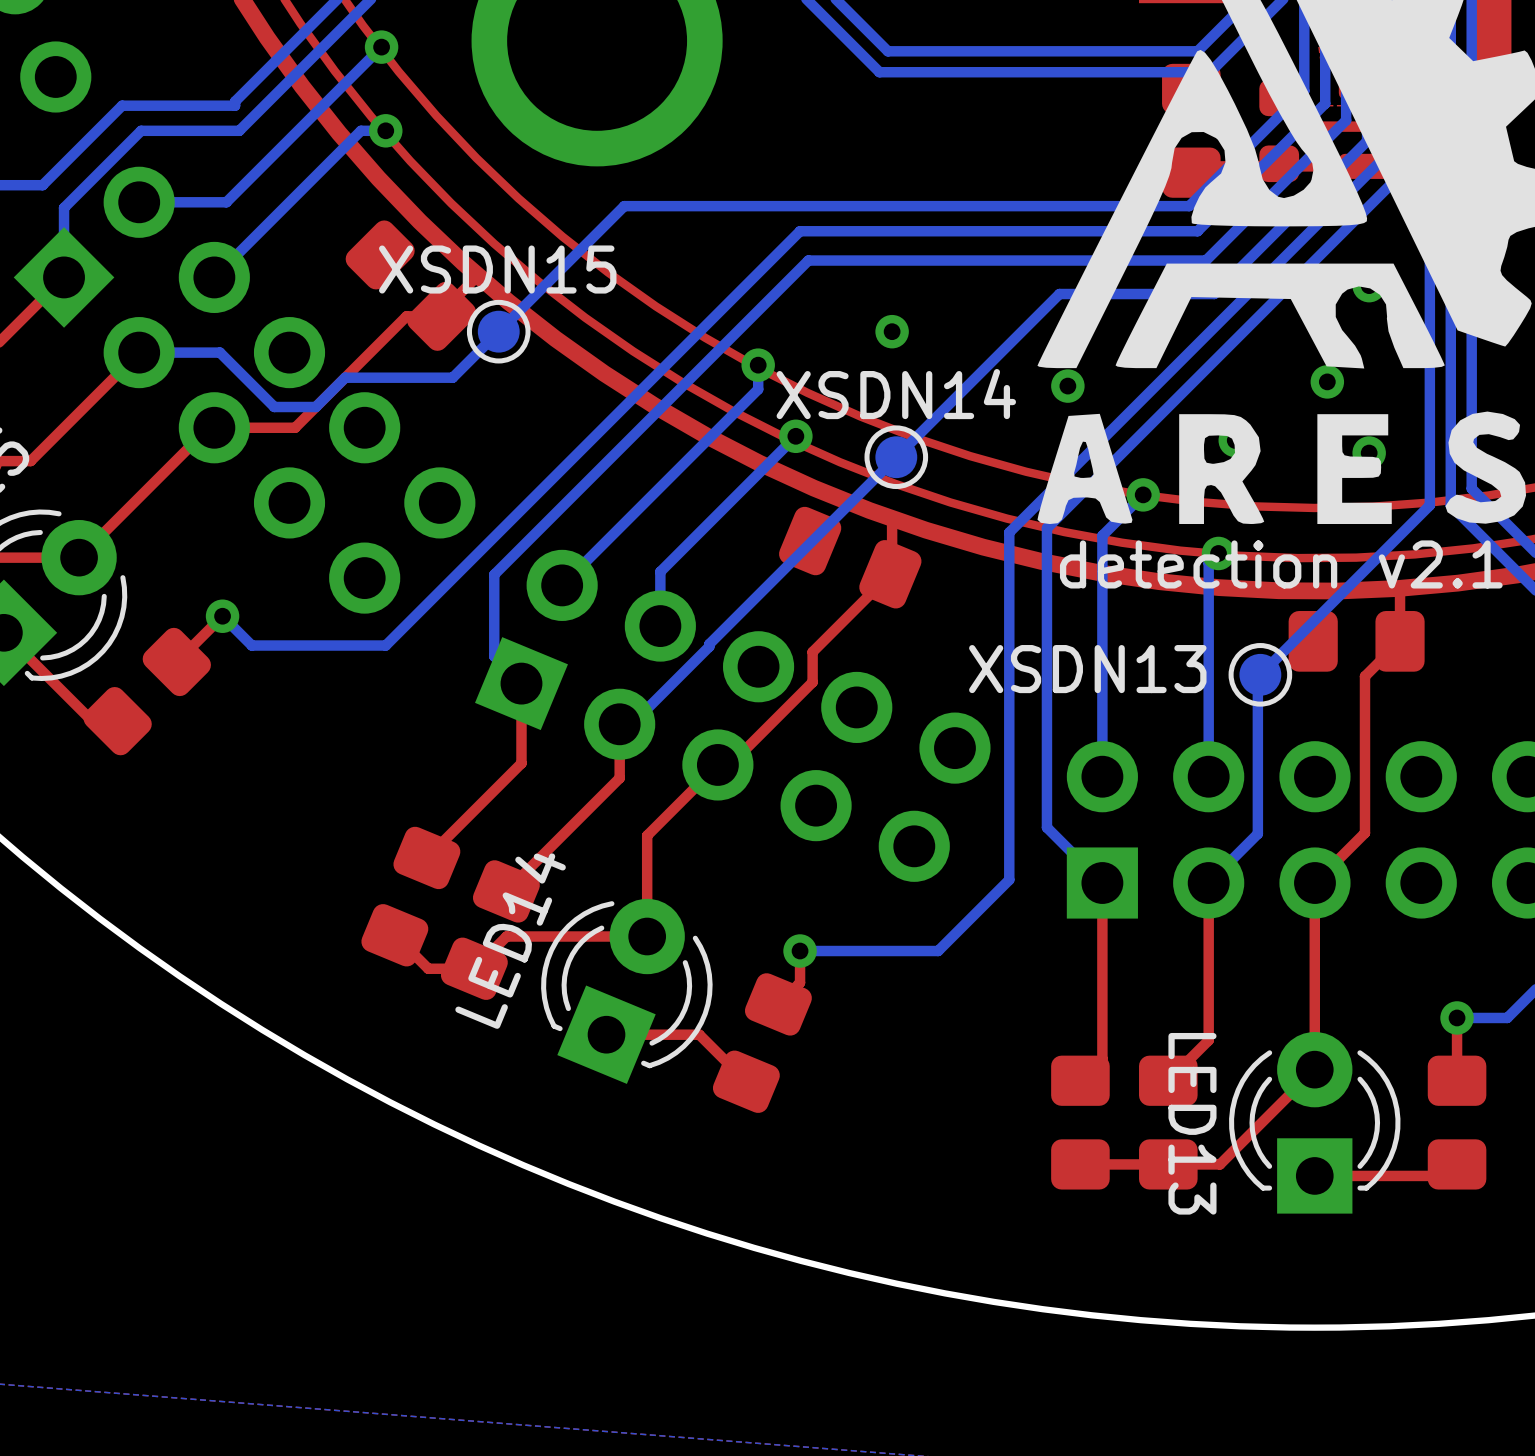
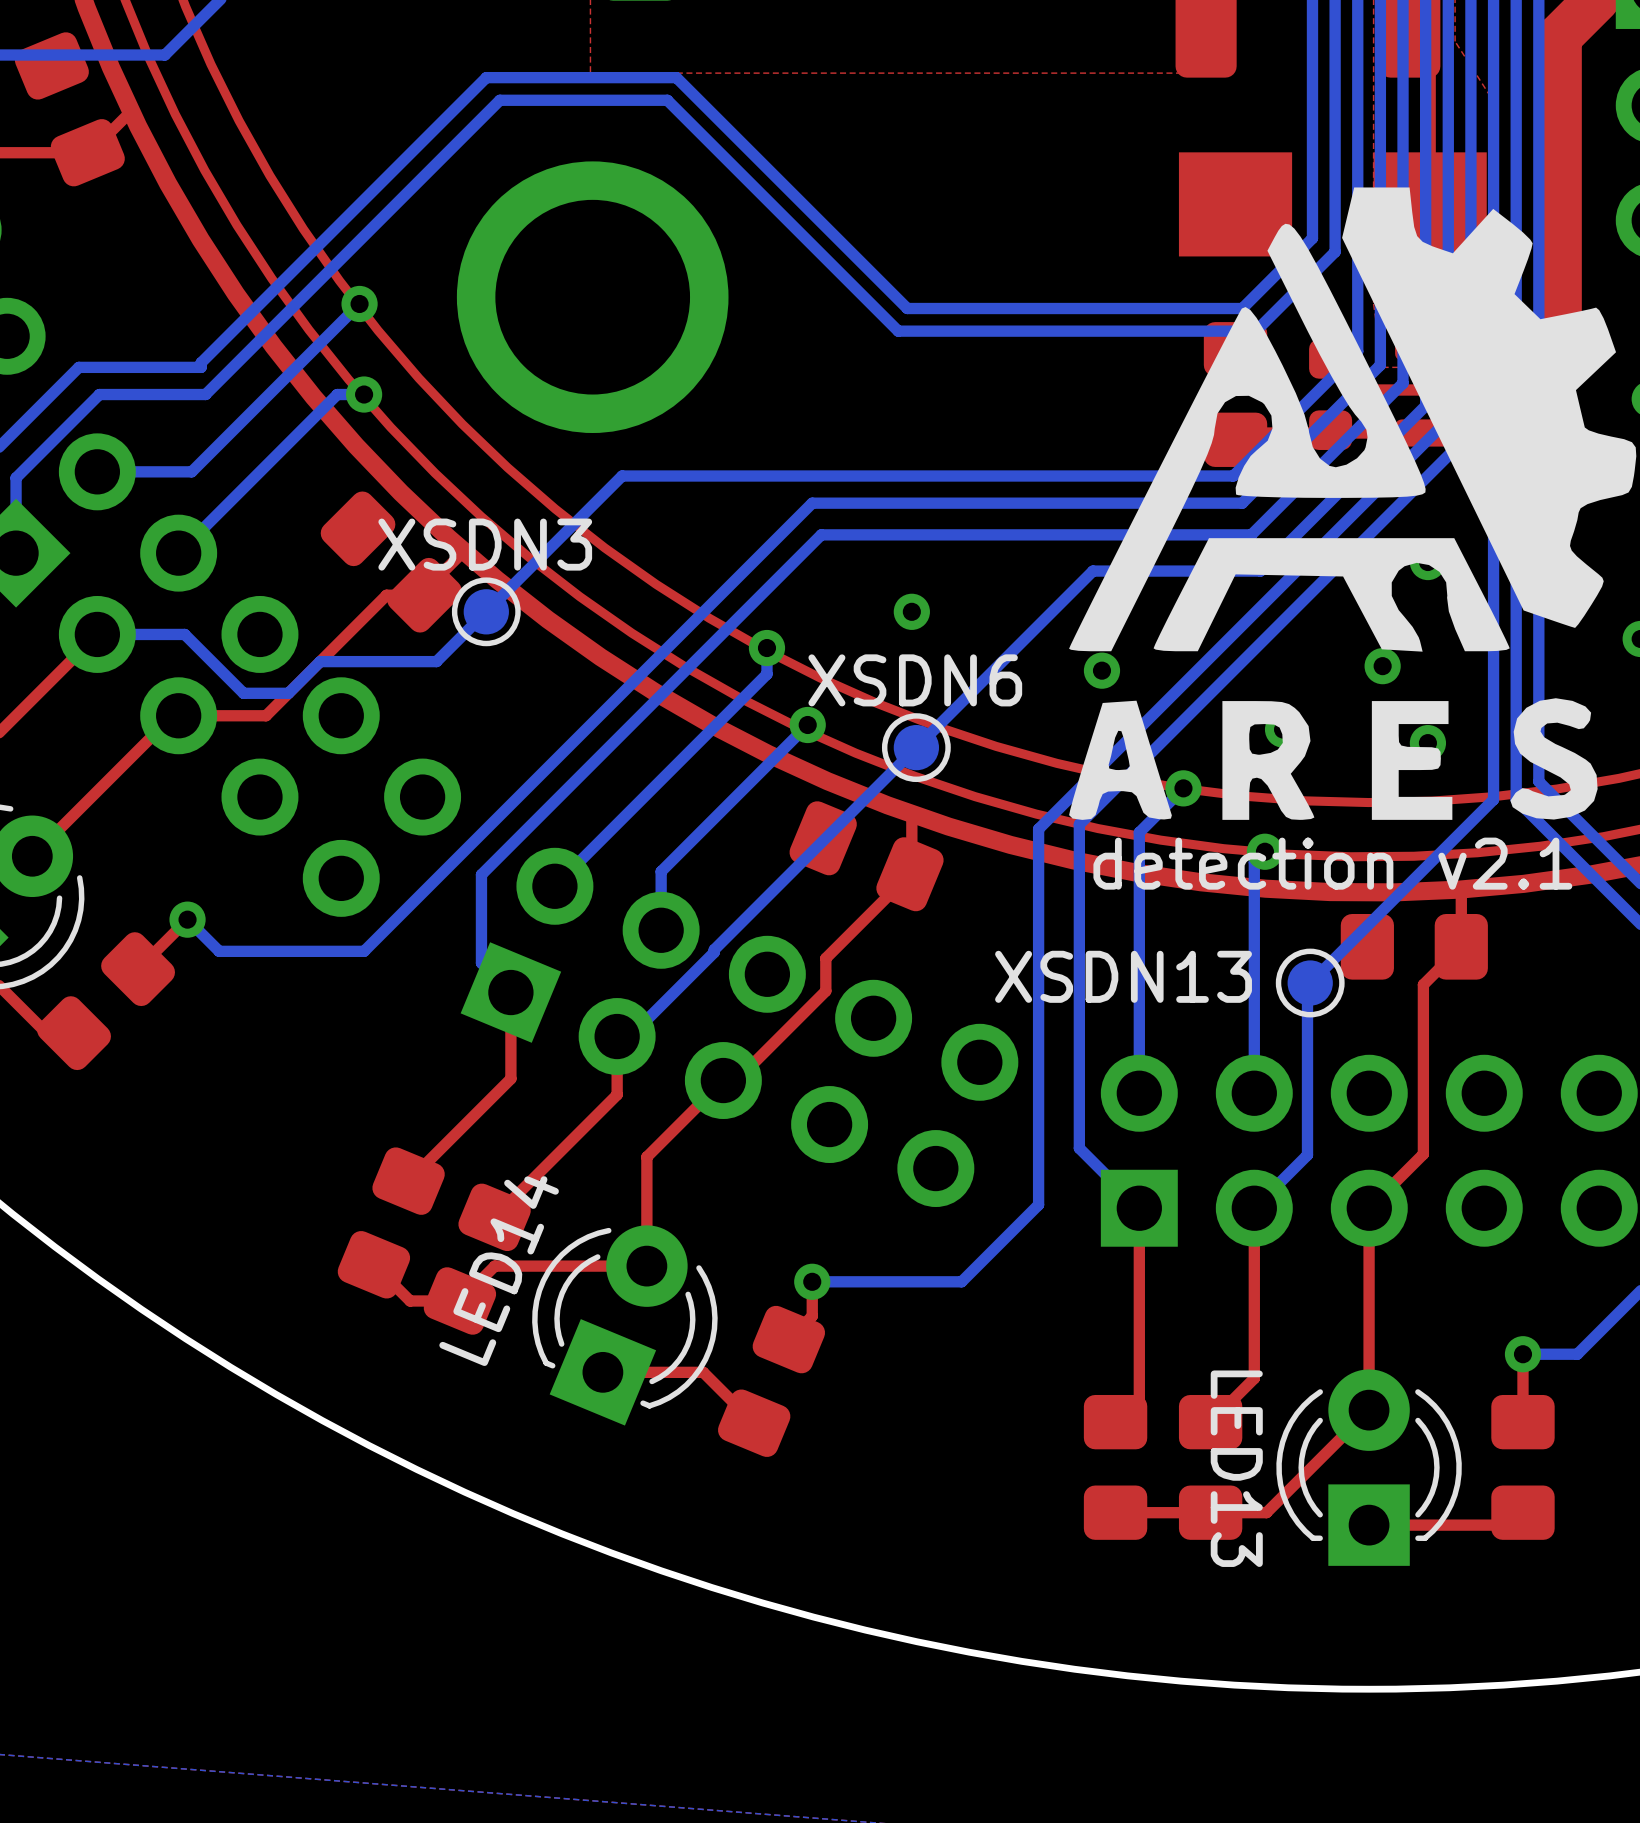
XSDN15 name: XSDN15 (497, 269) -> XSDN3 (485, 544)
XSDN14 name: XSDN14 (896, 394) -> XSDN6 (915, 680)

